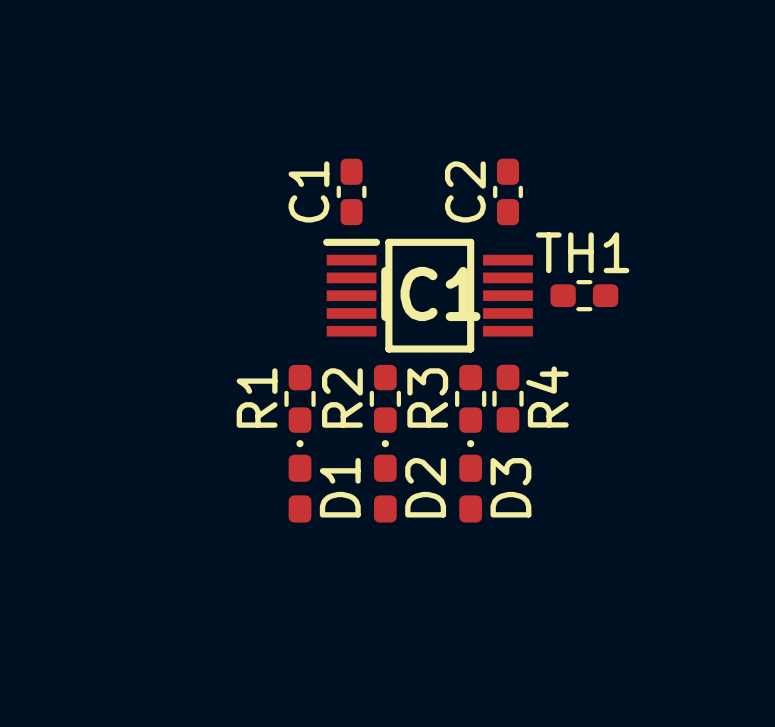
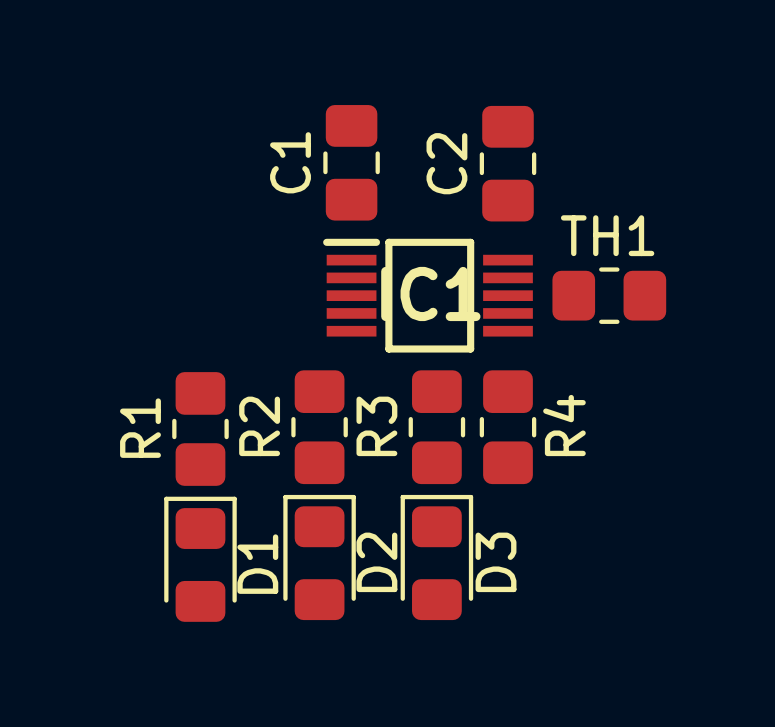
C1 footprint: [336, 158, 367, 226] -> [323, 105, 380, 221]
C2 footprint: [493, 158, 523, 226] -> [479, 105, 537, 222]
TH1 footprint: [550, 280, 619, 312] -> [552, 267, 667, 324]
R1 footprint: [284, 364, 316, 433] -> [172, 372, 229, 486]
R2 footprint: [369, 364, 401, 433] -> [291, 370, 348, 485]
R3 footprint: [455, 364, 487, 433] -> [408, 370, 466, 485]
R4 footprint: [492, 364, 524, 433] -> [479, 370, 537, 485]
D1 footprint: [288, 440, 312, 523] -> [164, 496, 237, 622]
D2 footprint: [373, 440, 397, 523] -> [283, 494, 356, 621]
D3 footprint: [459, 440, 483, 523] -> [400, 494, 474, 621]

